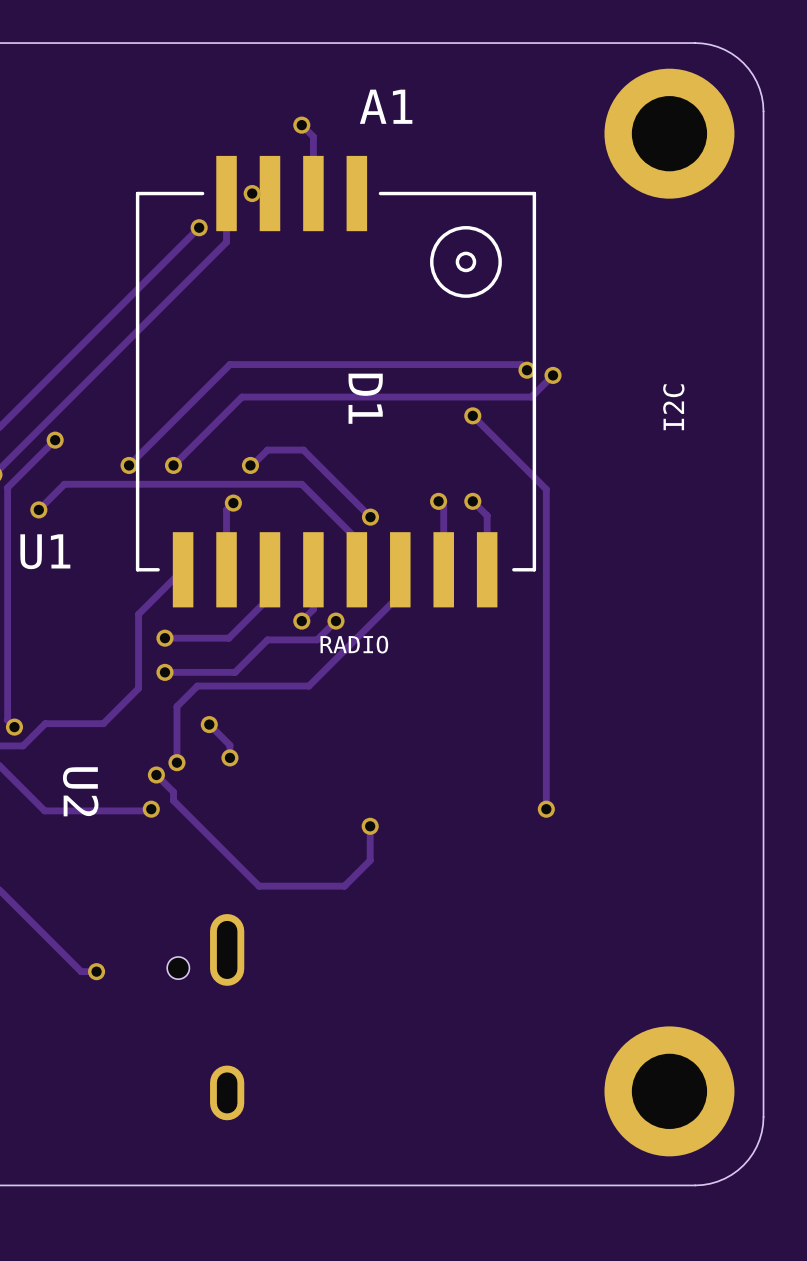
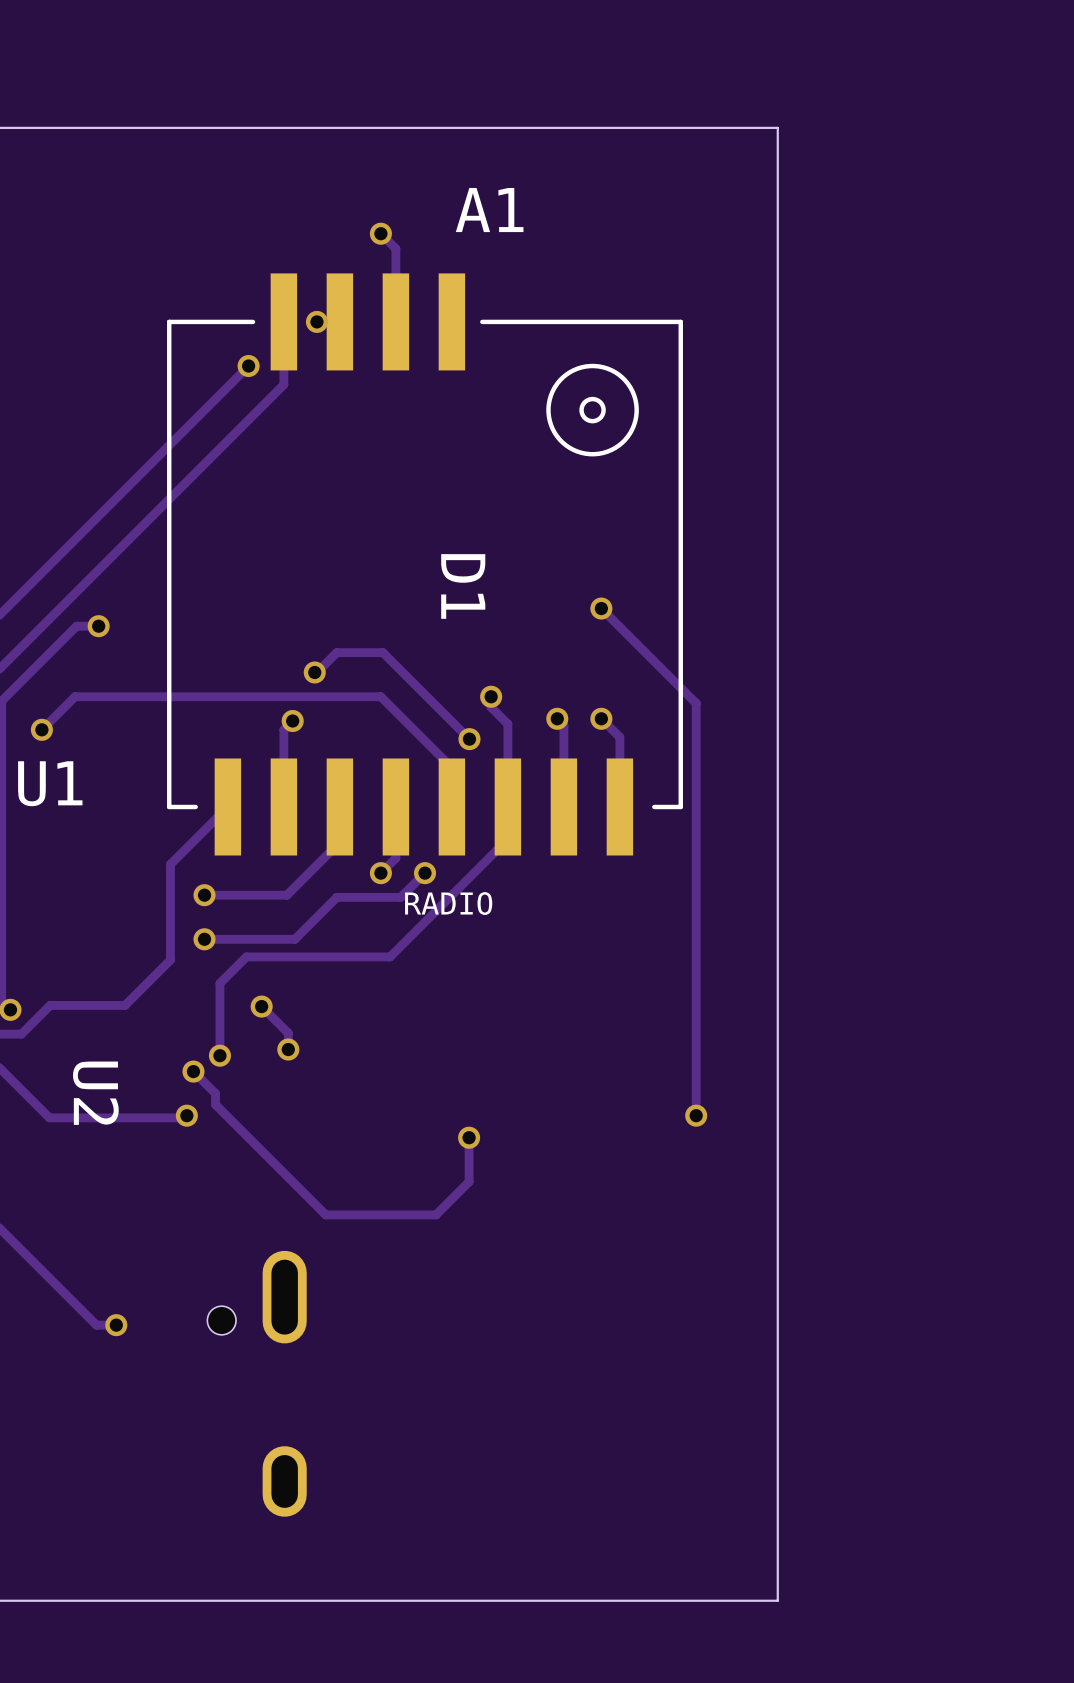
board edge: (609, 43) (702, 43) (724, 49) (743, 63) (753, 75) (759, 88) (763, 111) (763, 1124) (756, 1146) (748, 1159) (731, 1174) (717, 1181) (695, 1185) (609, 1185) -> (777, 127) (777, 1600)
part: (669, 133) -> none
track: (527, 370) (521, 364) (229, 364) (129, 465) -> none
via: (527, 370) -> none
track: (553, 375) (531, 397) (242, 397) (173, 465) -> none
via: (553, 375) -> none
text: I2C (673, 407) -> none
track: none -> (98, 626) (76, 626) (62, 639)
via: none -> (98, 626)
via: (55, 440) -> none
via: (129, 465) -> none
via: (173, 465) -> none
track: none -> (491, 696) (491, 707) (507, 724) (507, 806)
via: none -> (491, 696)
part: (669, 1091) -> none

